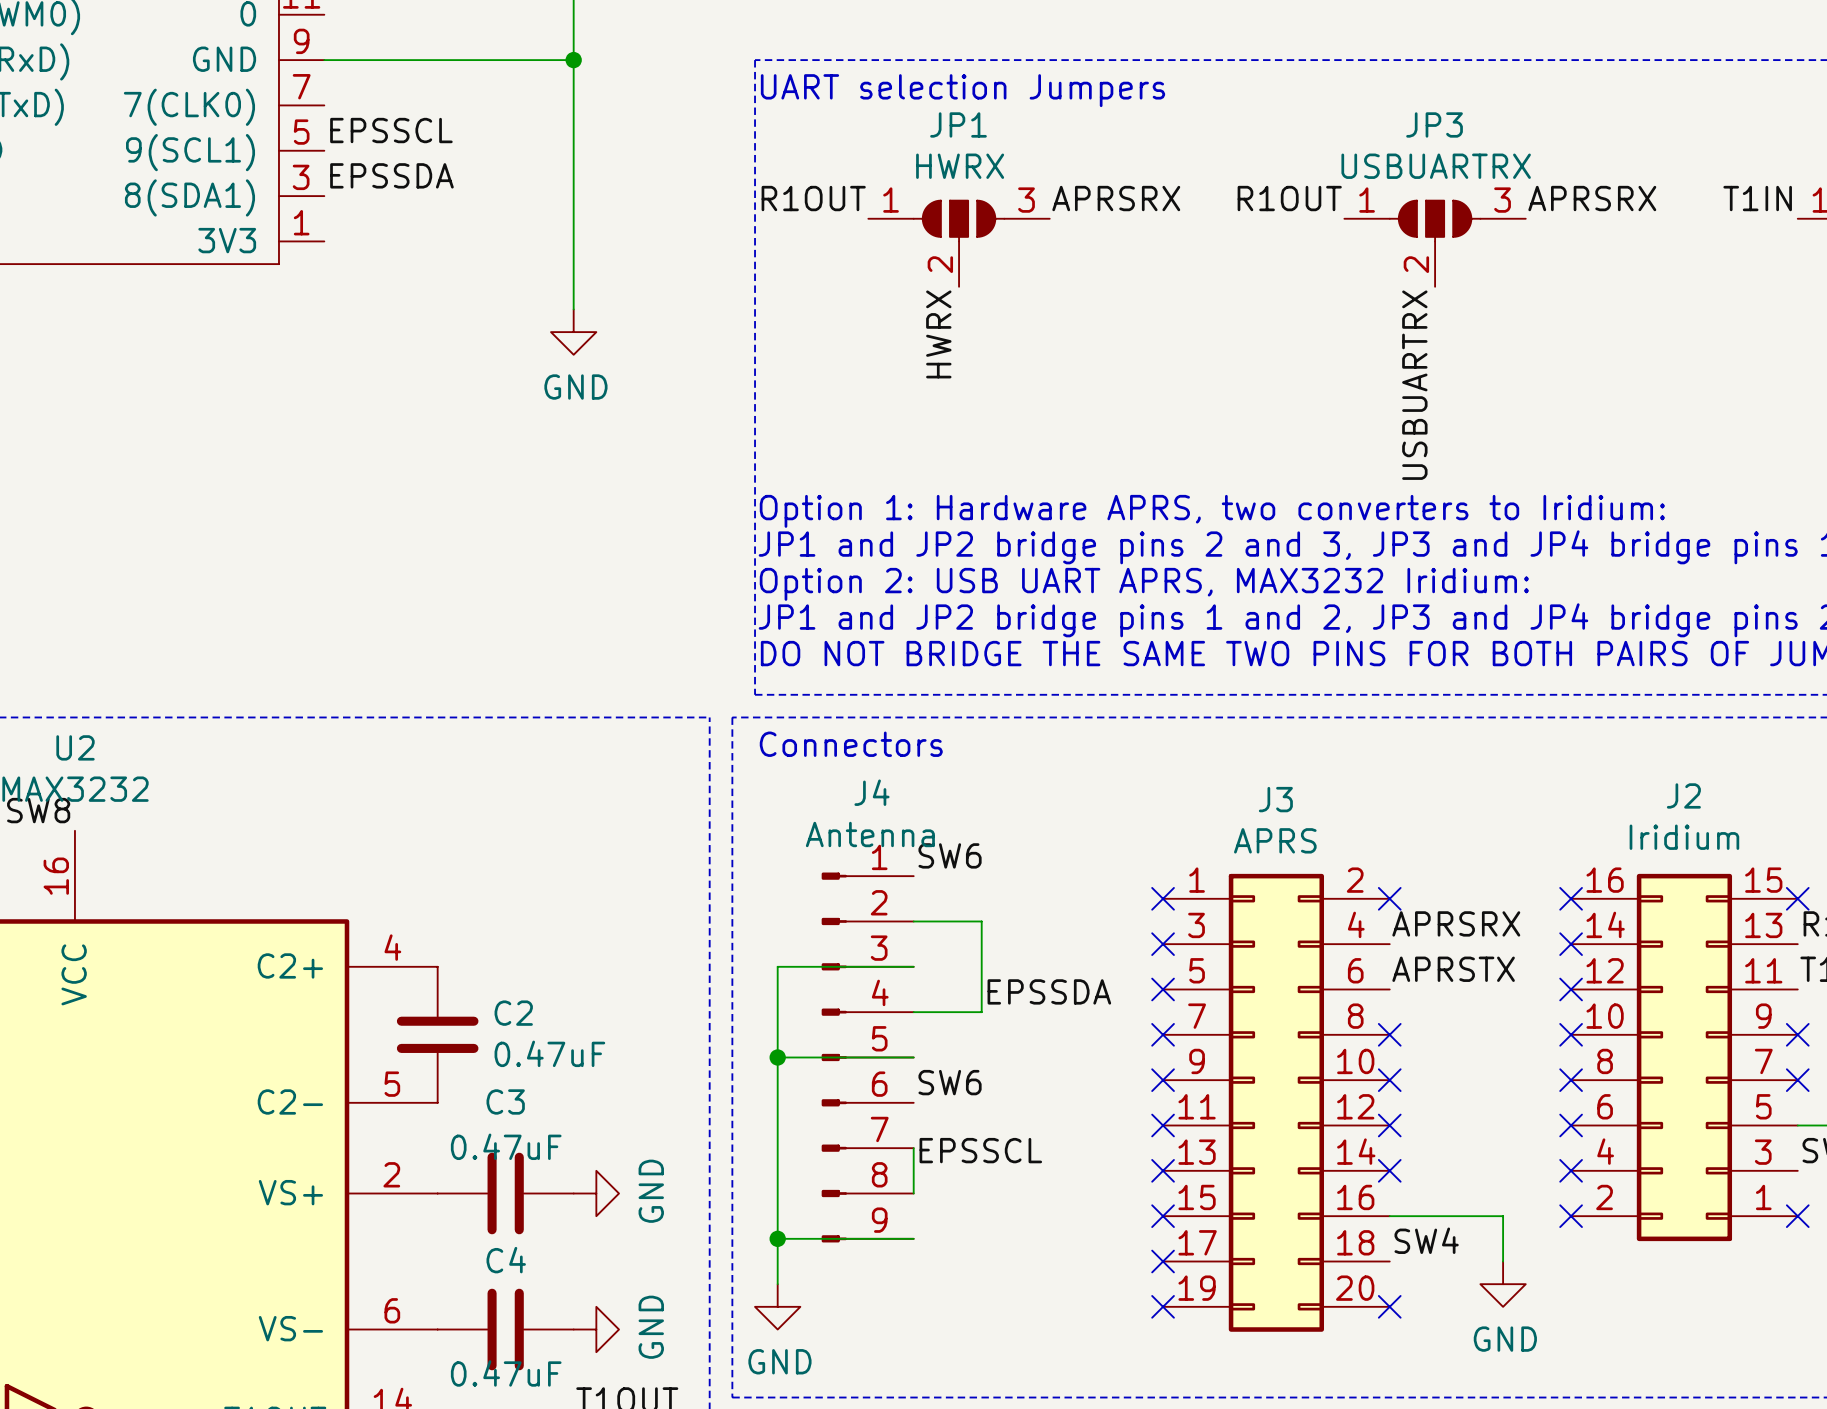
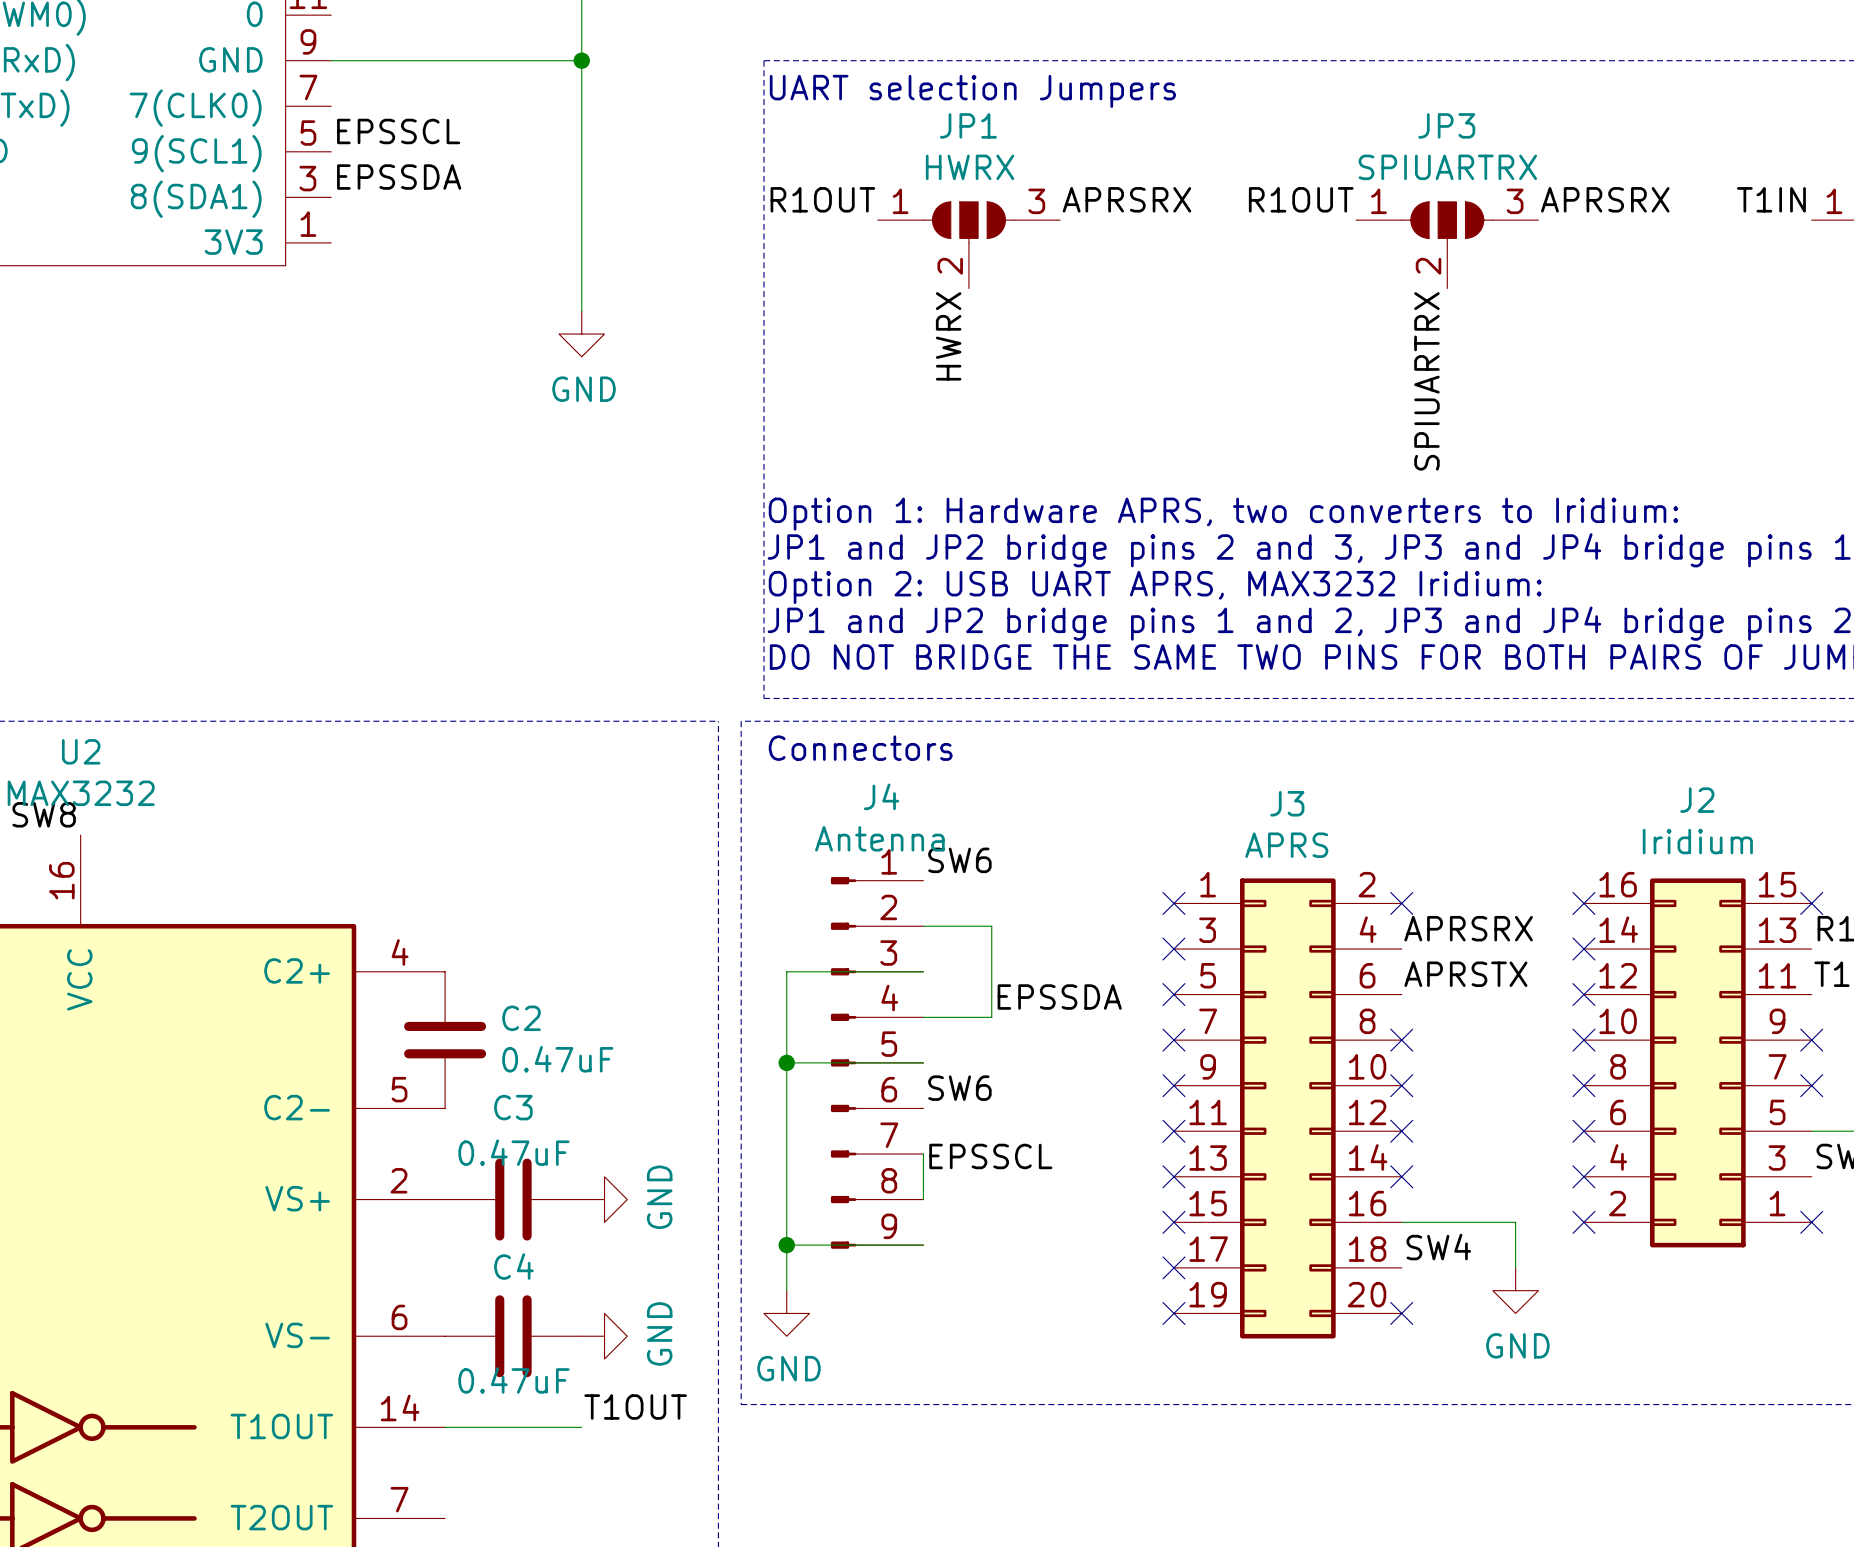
JP3 value: USBUARTRX (1436, 166) -> SPIUARTRX (1447, 167)
label: USBUARTRX (1414, 385) -> SPIUARTRX (1426, 381)

